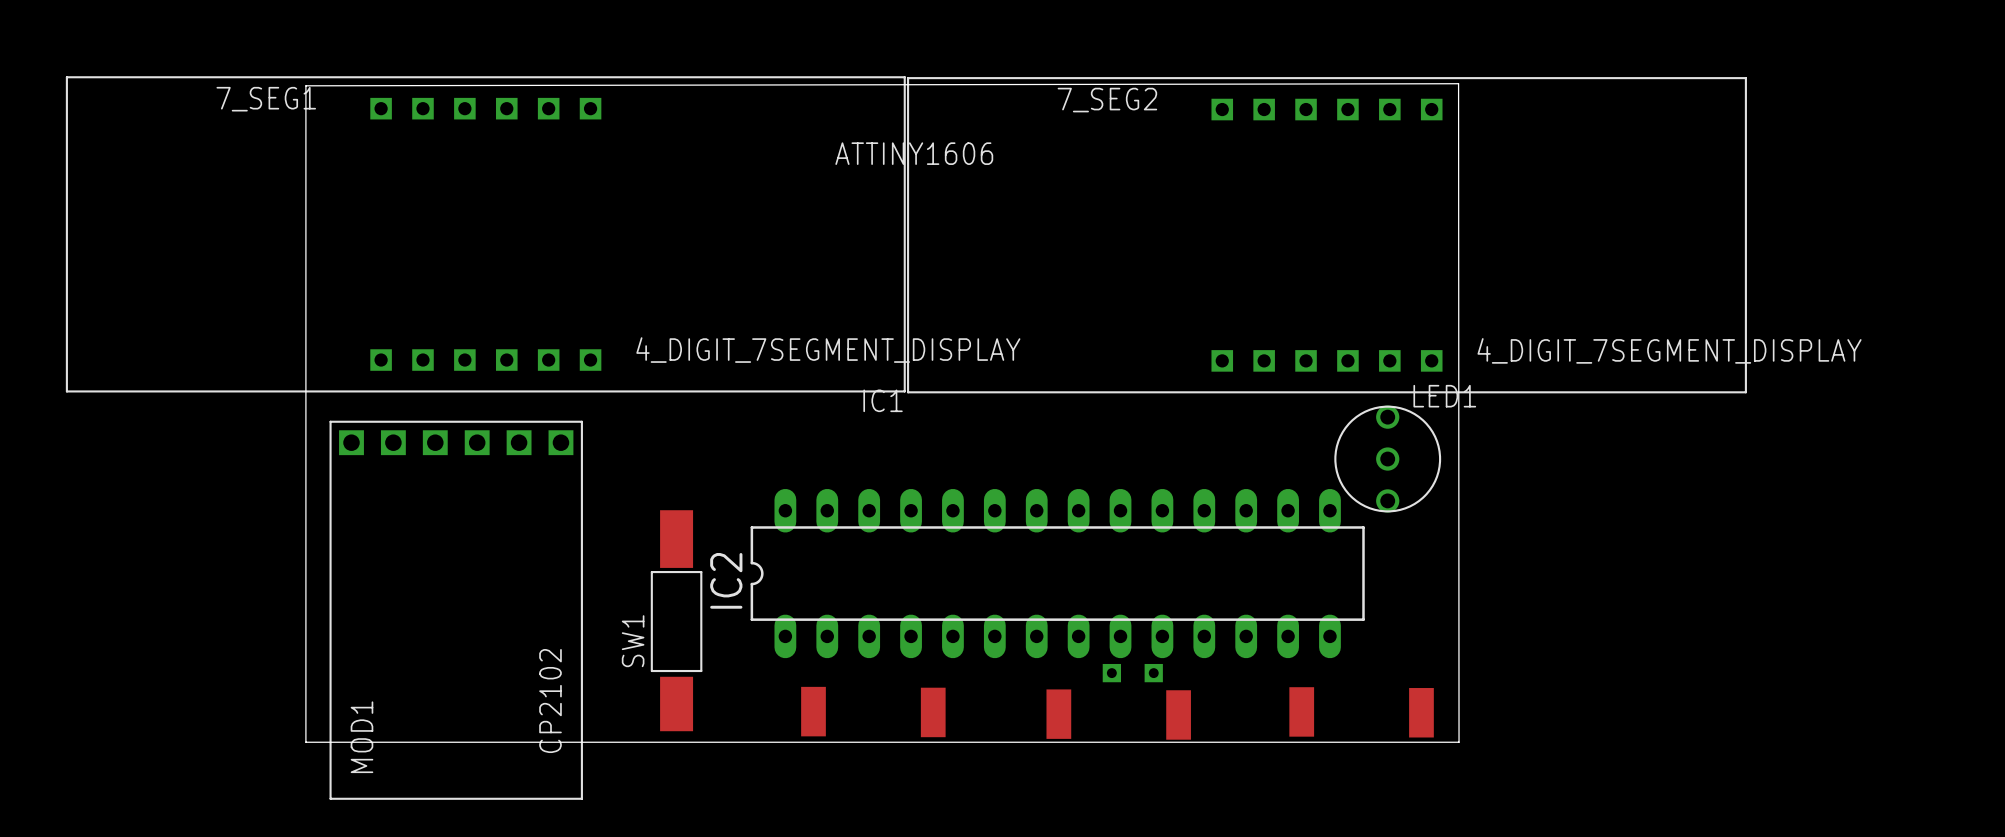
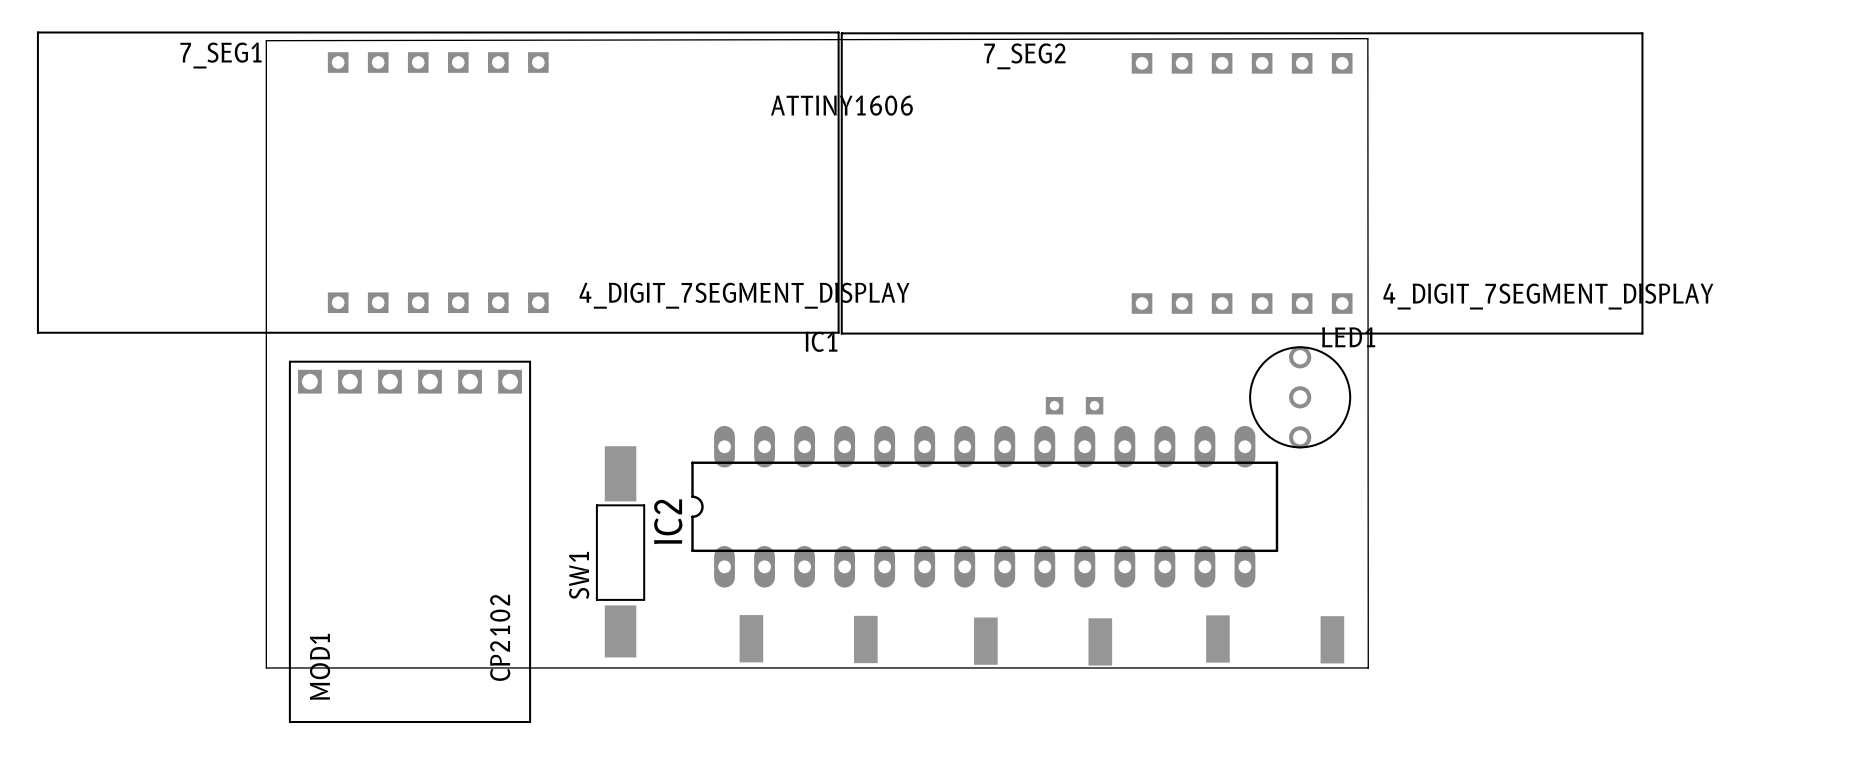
part position: (1132, 673) -> (1074, 405)

